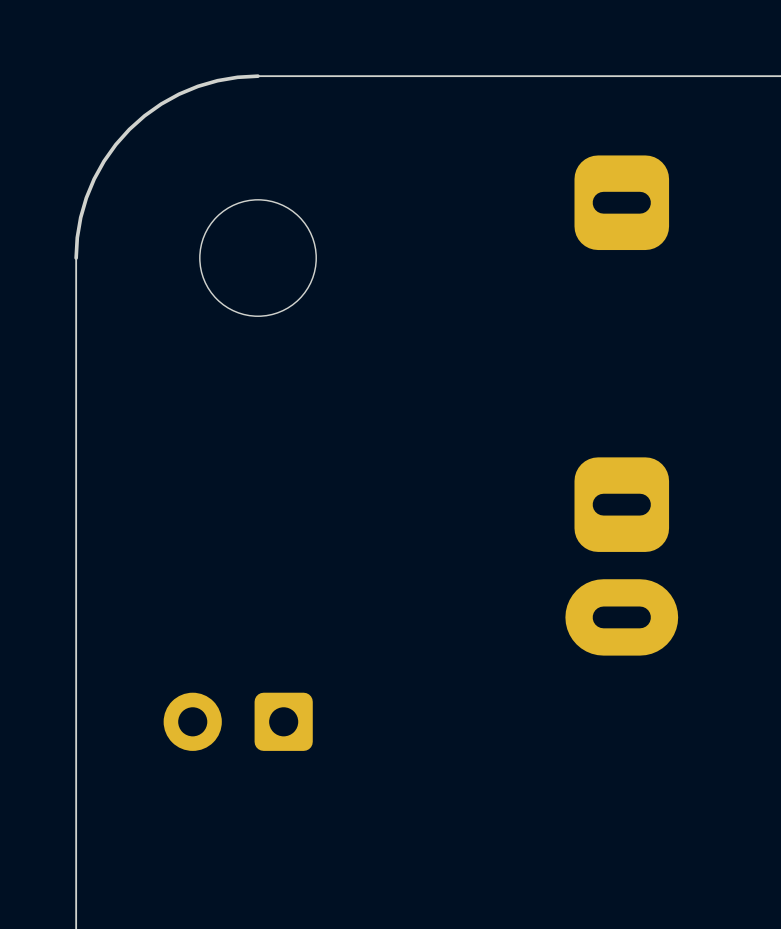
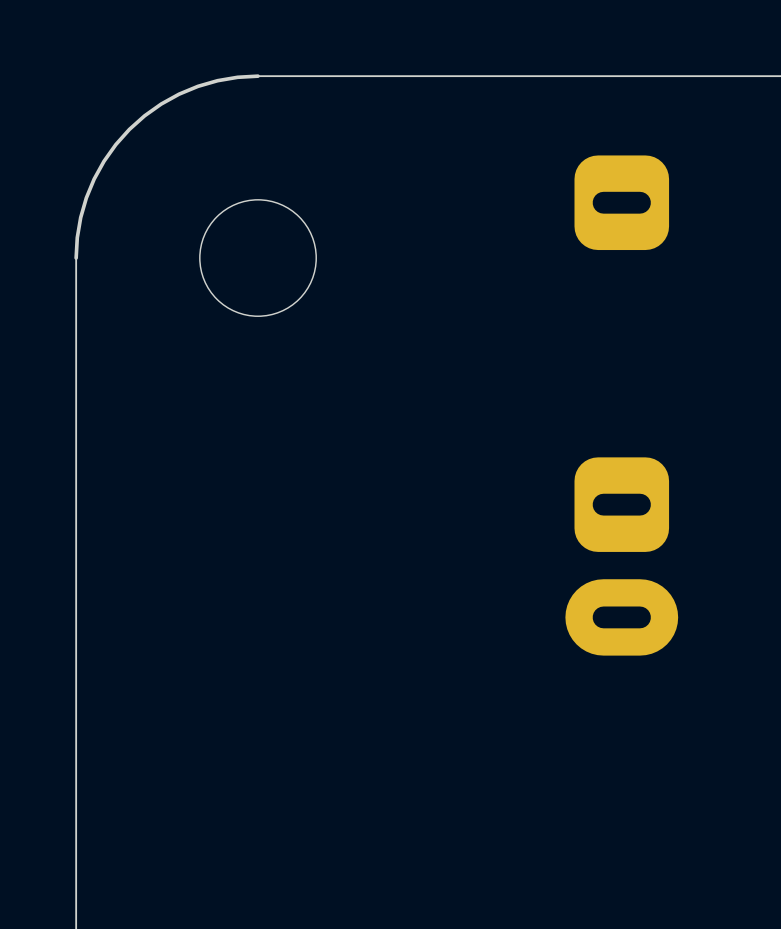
part: (238, 721) -> none

